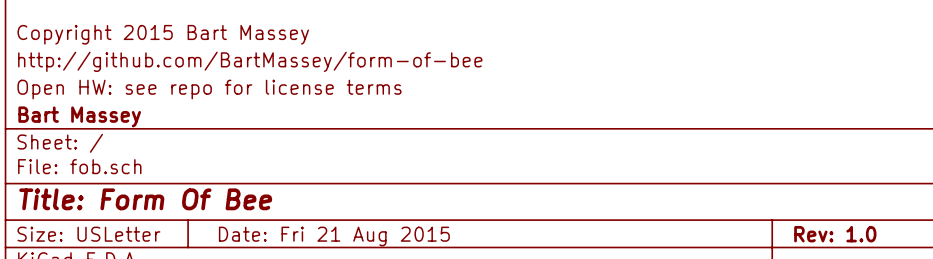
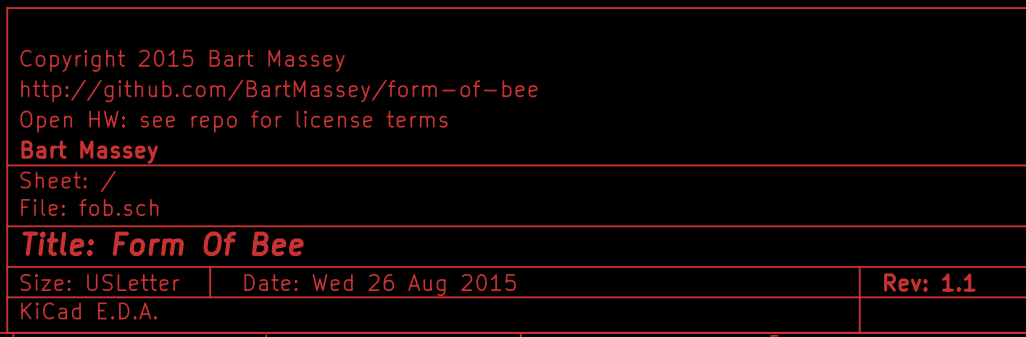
title block: Rev: 1.0 (835, 234) -> Rev: 1.1 (929, 282)
title block: Date: Fri 21 Aug 2015 (334, 236) -> Date: Wed 26 Aug 2015 (380, 285)

